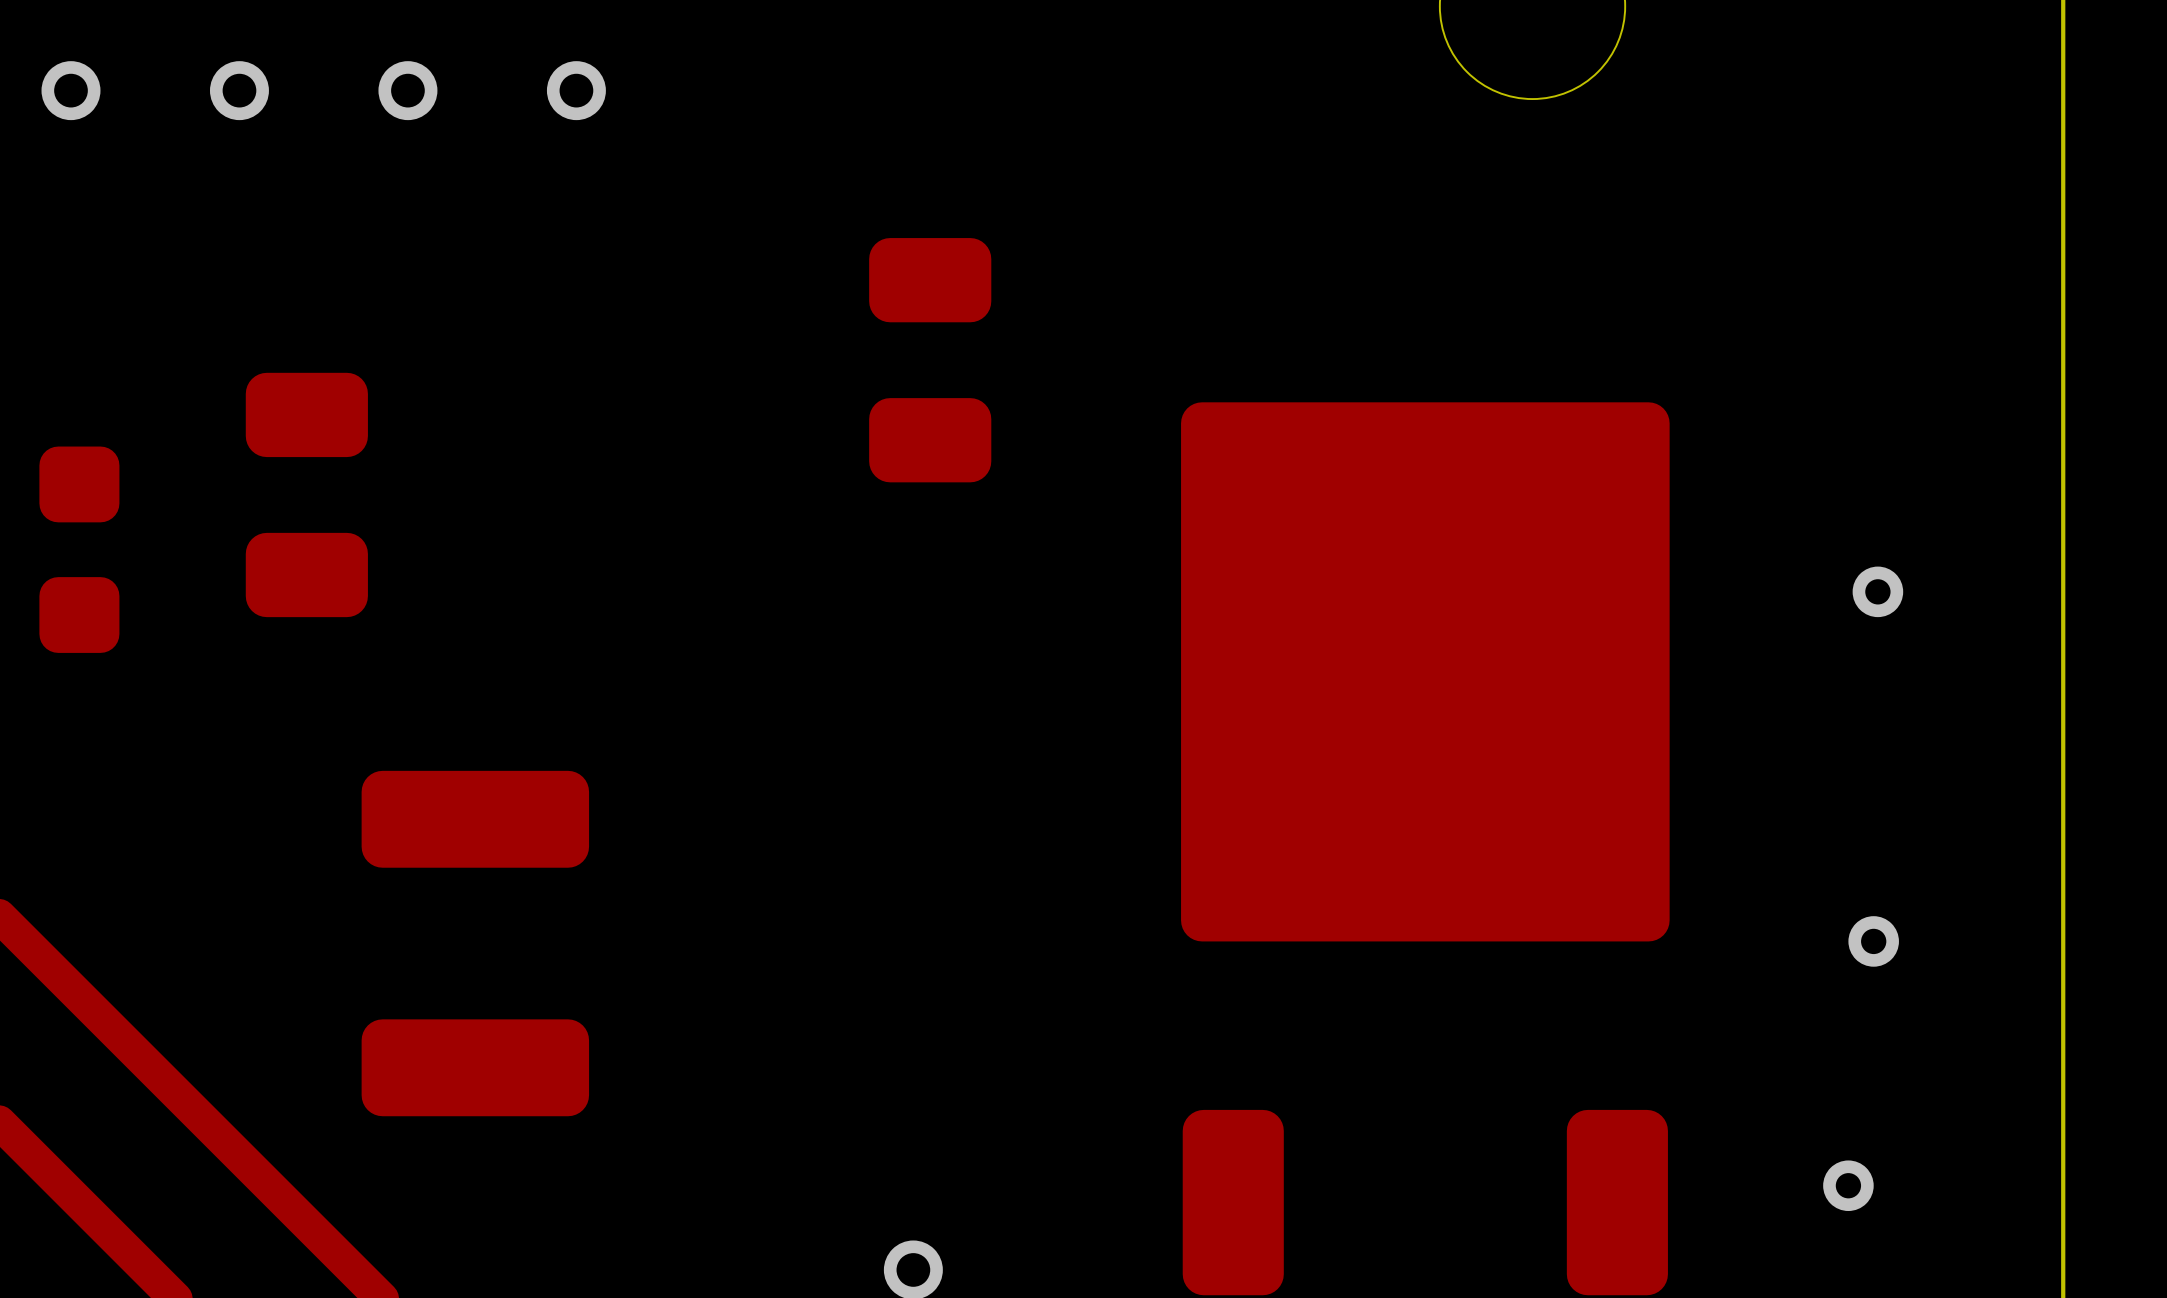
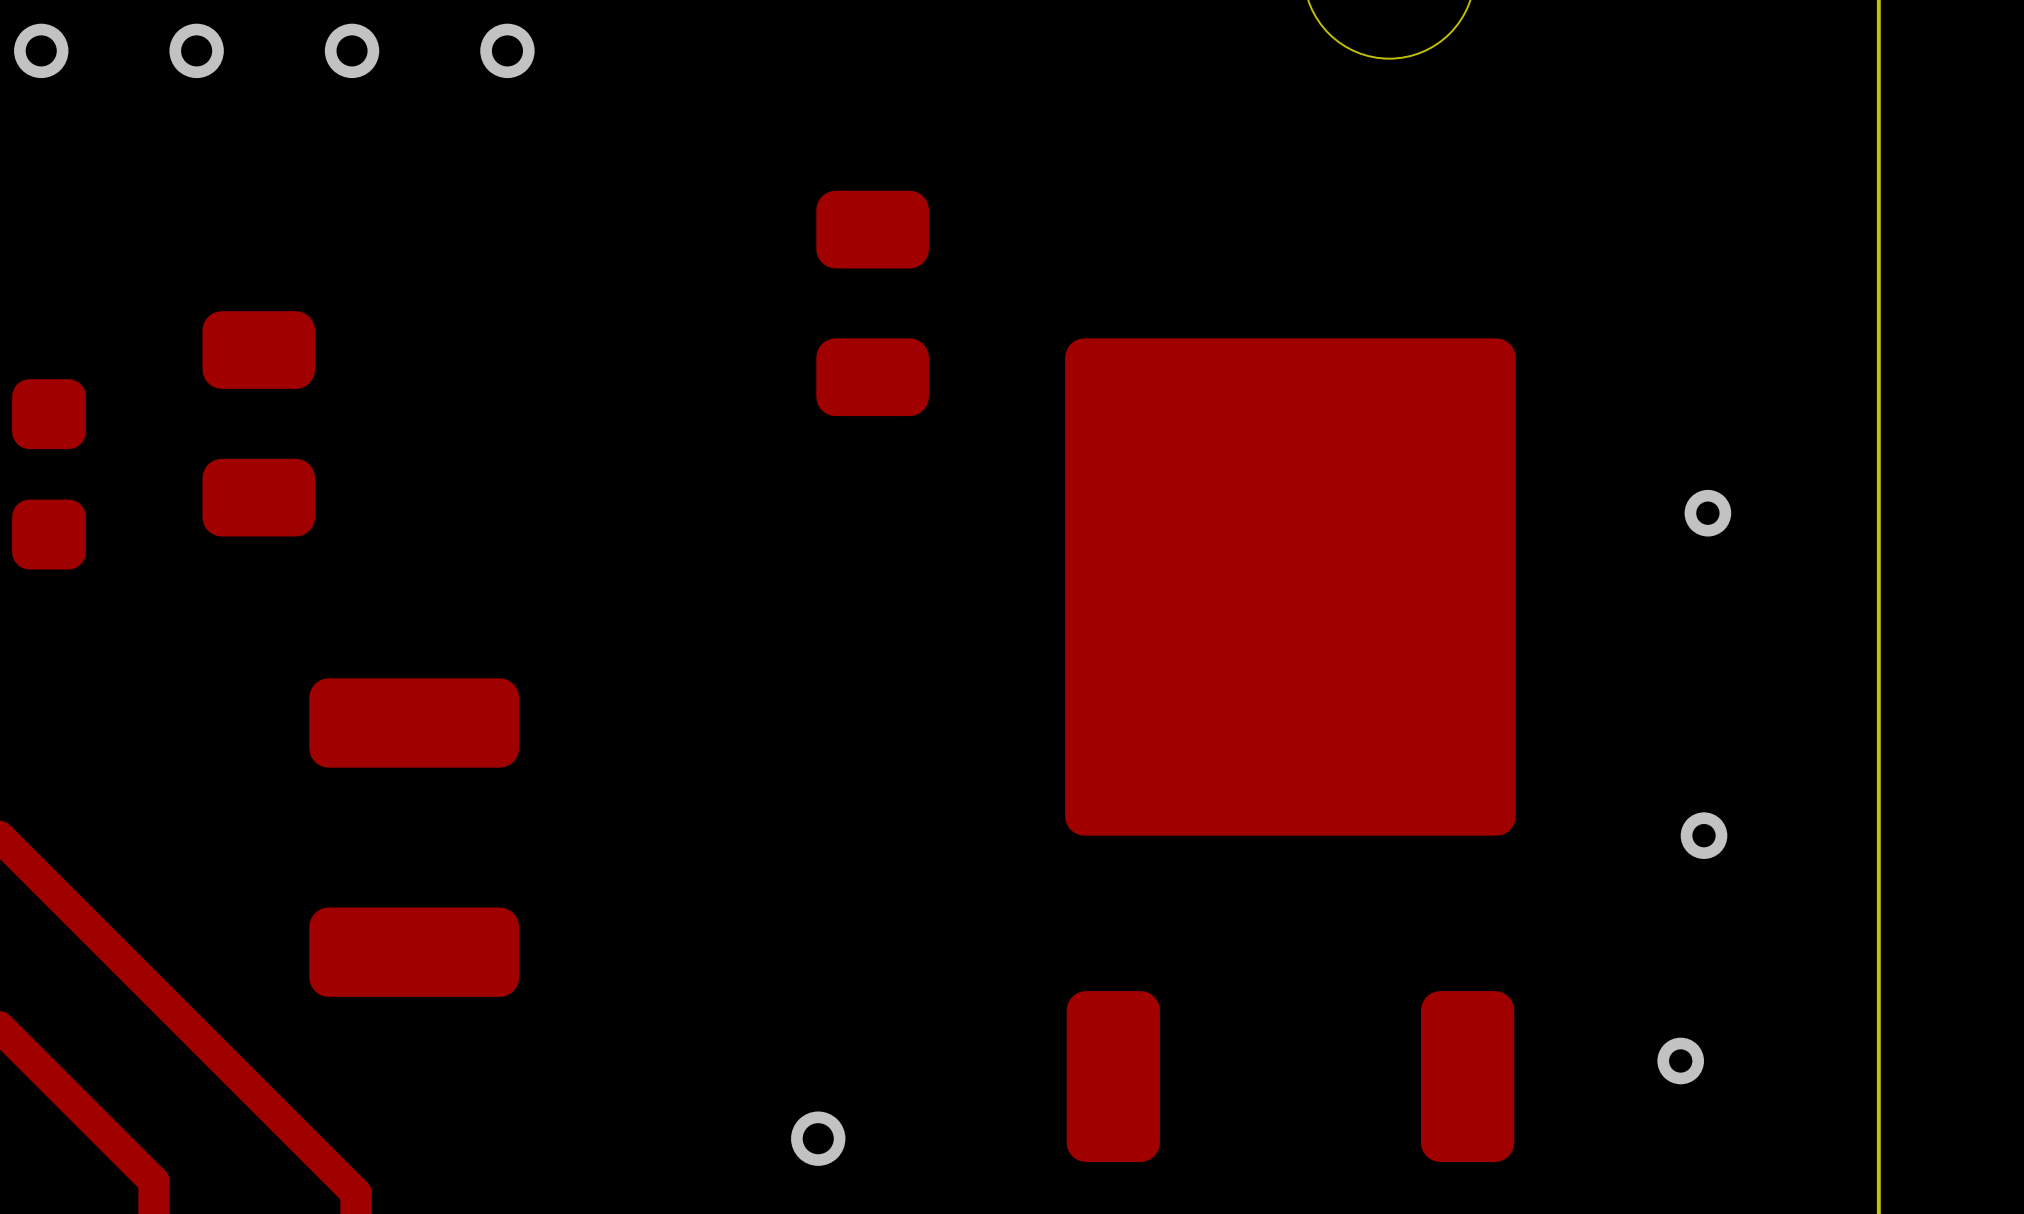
part position: (930, 360) -> (872, 303)

